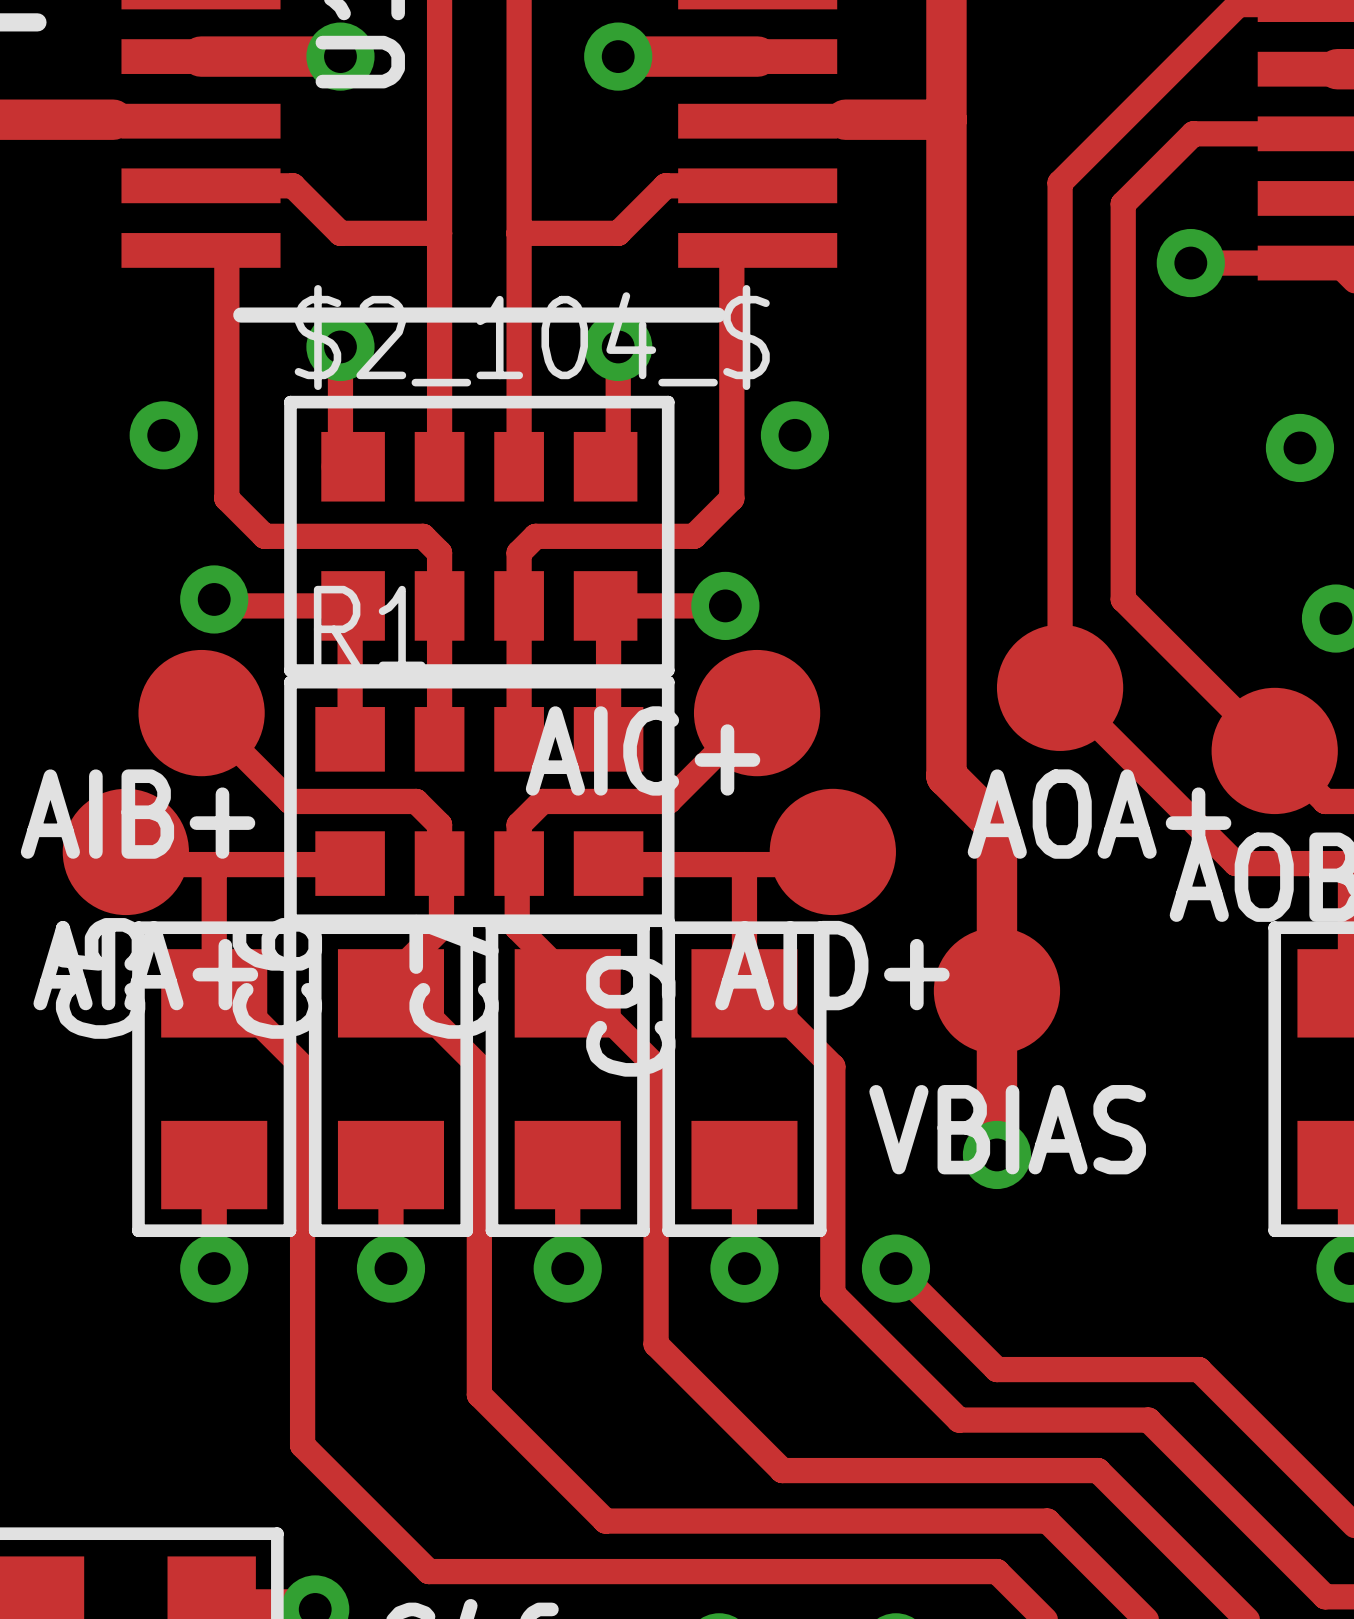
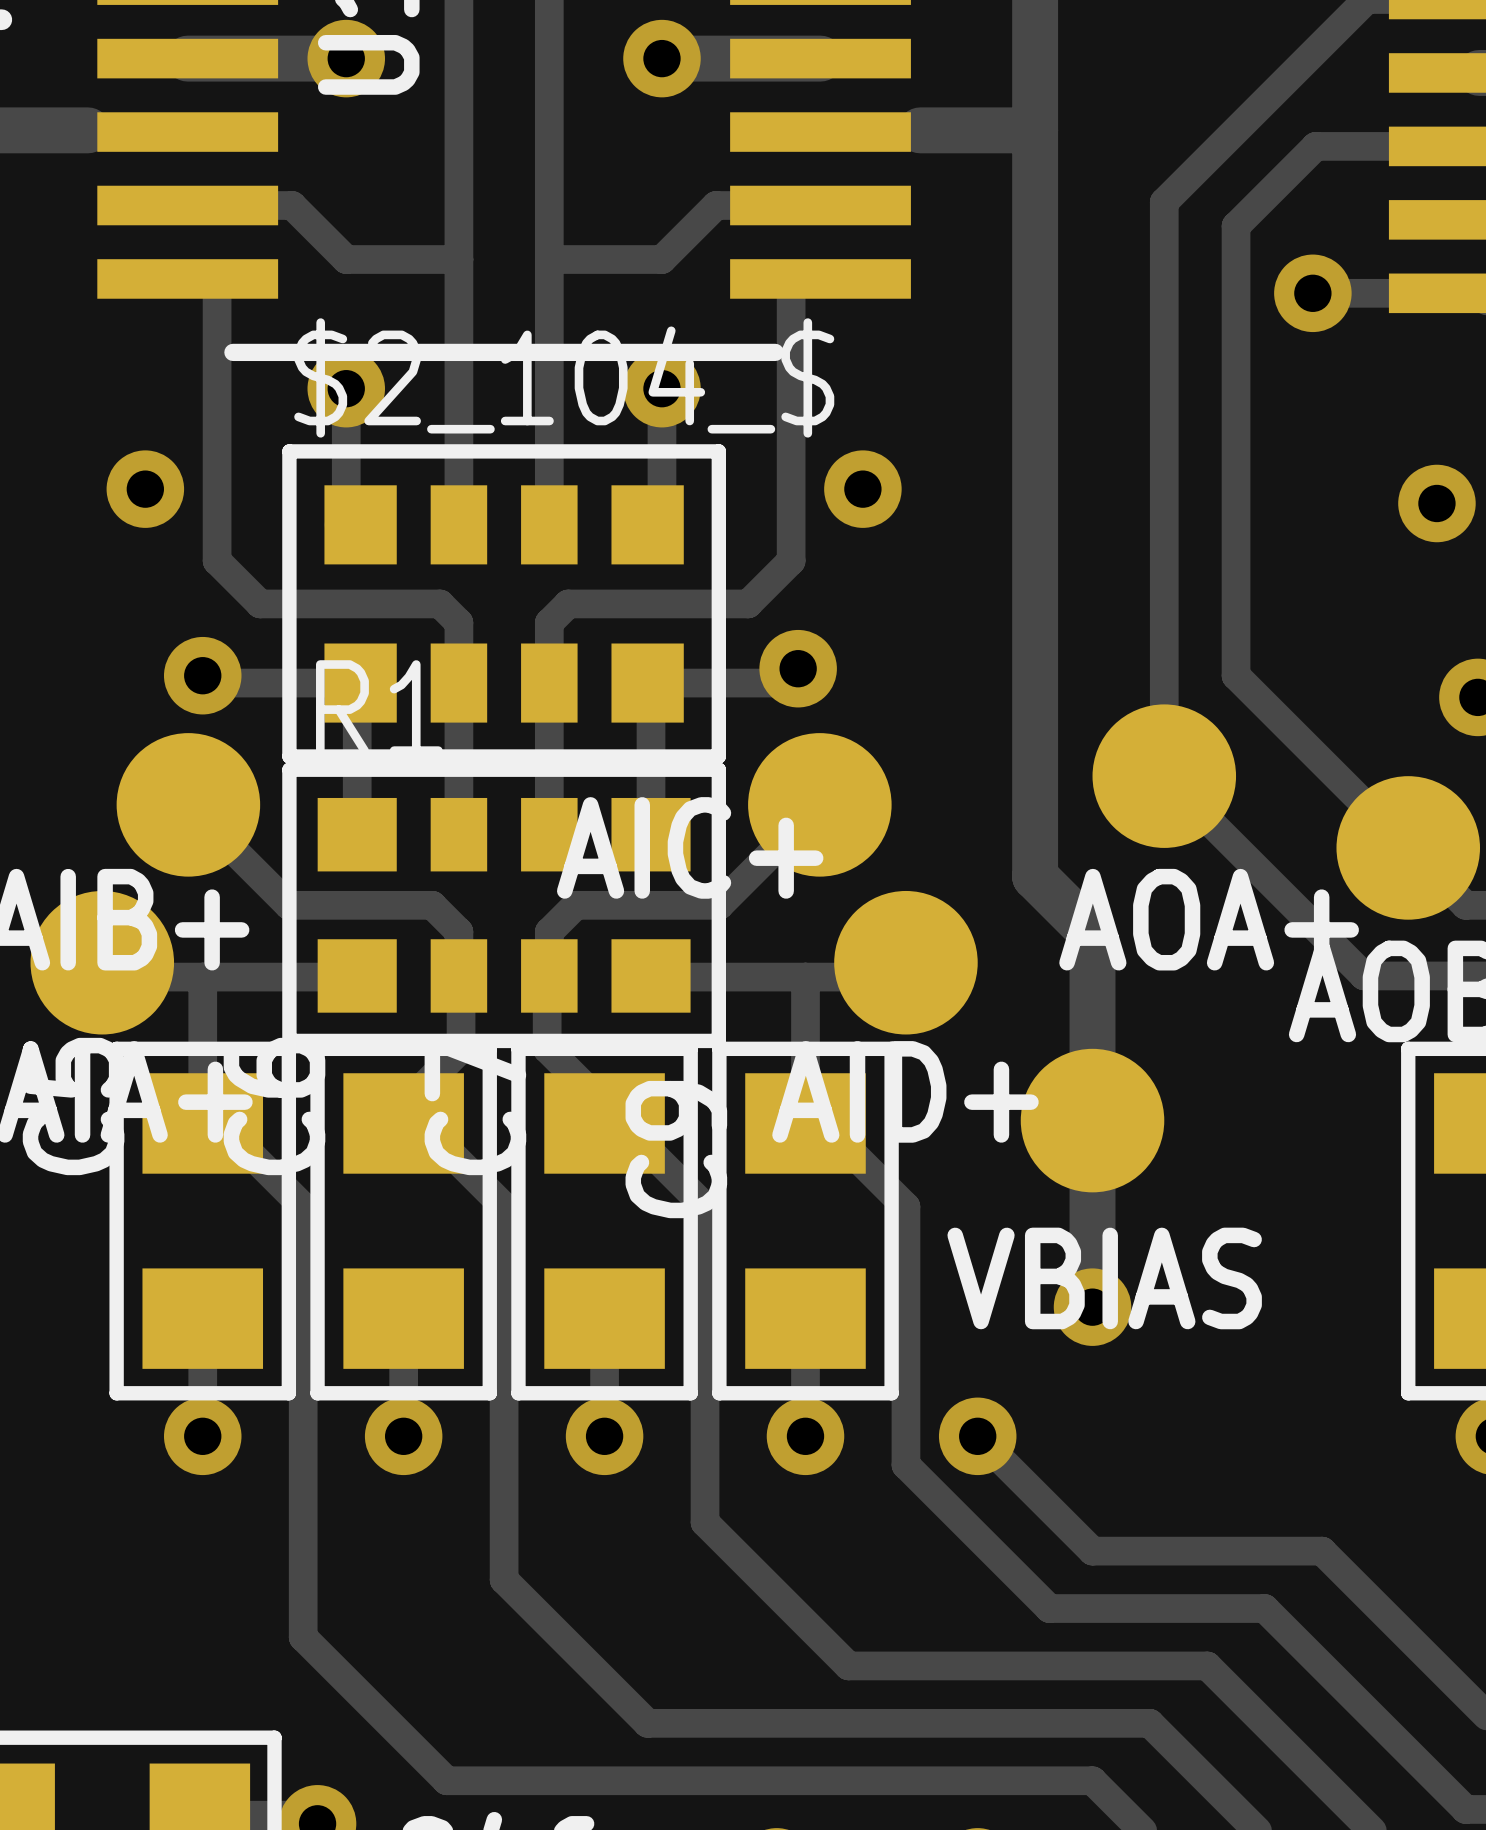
via position: (725, 605) -> (798, 668)

